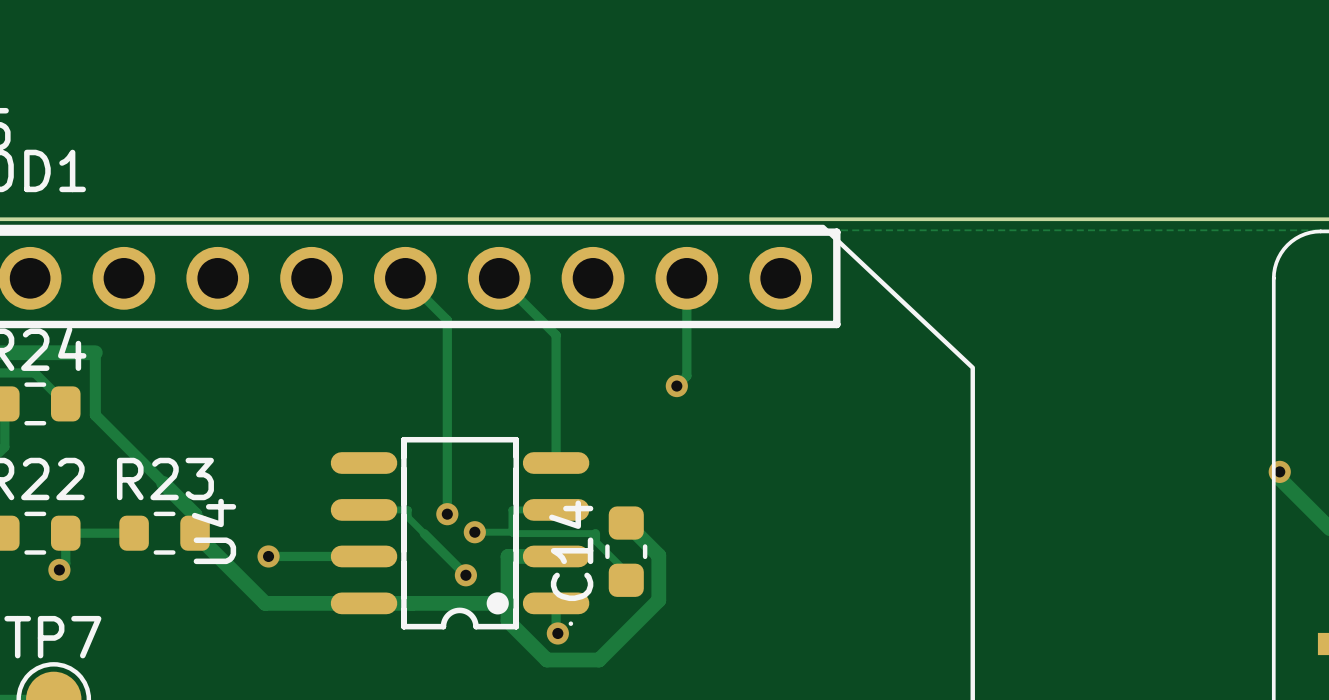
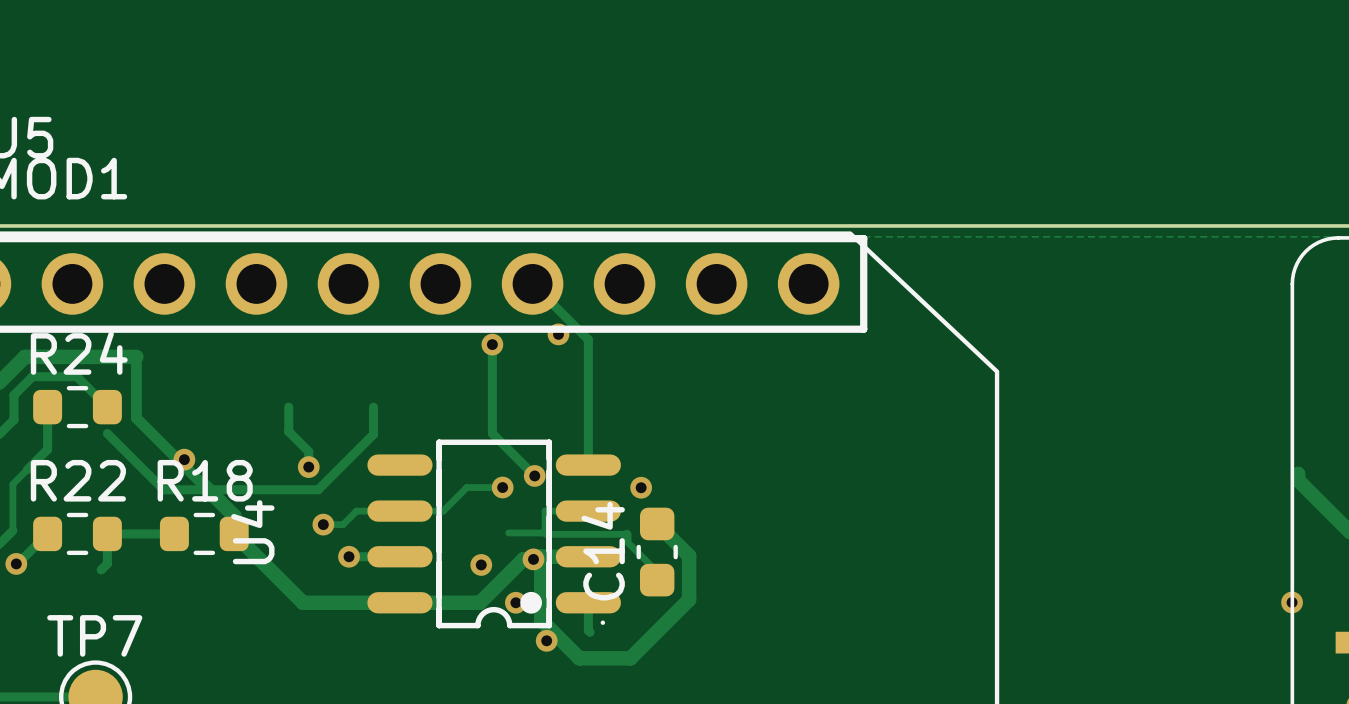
track: (405, 278) (447, 320) (447, 514) -> none
track: (686, 278) (686, 376) (676, 386) -> none
via: none -> (558, 334)
track: none -> (492, 344) (492, 433) (534, 475)
via: none -> (492, 344)
via: (676, 386) -> none
track: none -> (288, 407) (288, 431) (308, 451) (308, 467)
track: none -> (373, 407) (373, 434) (318, 489) (163, 489) (107, 433)
via: none -> (184, 459)
via: none -> (308, 467)
via: (1279, 471) -> none
via: none -> (534, 475)
R23 name: R23 (165, 478) -> R18 (205, 480)
via: none -> (502, 487)
via: none -> (641, 487)
track: none -> (399, 511) (356, 511) (343, 524) (323, 524)
track: (408, 509) (408, 517) (465, 575) -> (443, 511) (466, 487) (502, 487)
via: (447, 514) -> none
via: none -> (323, 524)
via: (474, 532) -> none
track: (268, 556) (312, 556) -> none
via: (268, 556) -> none
via: none -> (349, 556)
via: none -> (533, 559)
via: (59, 569) -> none
via position: (465, 575) -> (481, 564)
track: (445, 603) (482, 603) -> (479, 602) (523, 559) (541, 556)
via: none -> (515, 602)
via: none -> (1292, 602)
via: (557, 633) -> none
via: none -> (546, 640)

